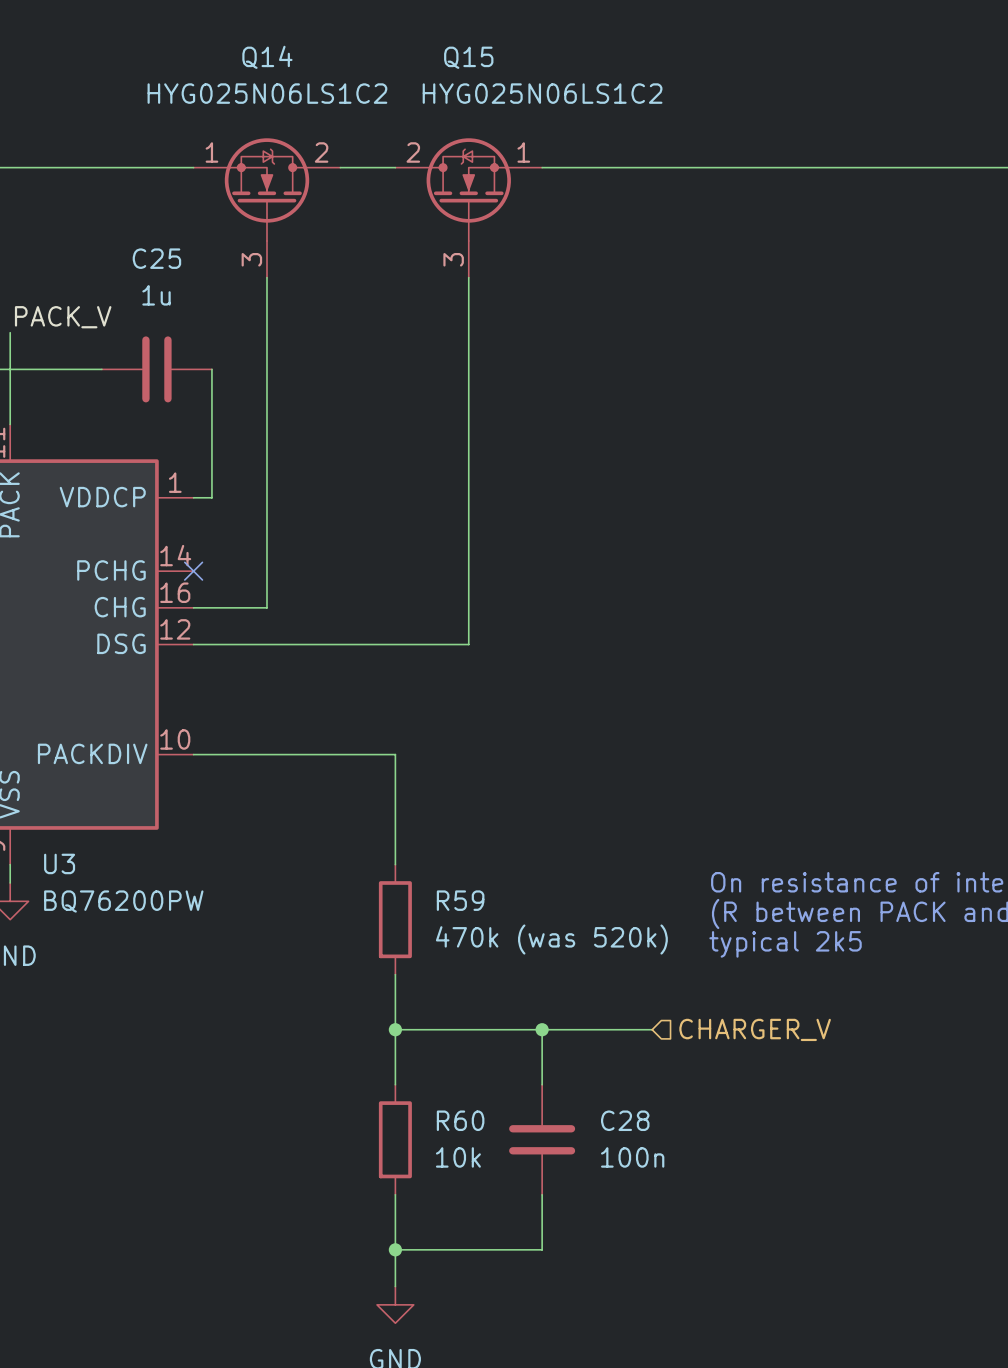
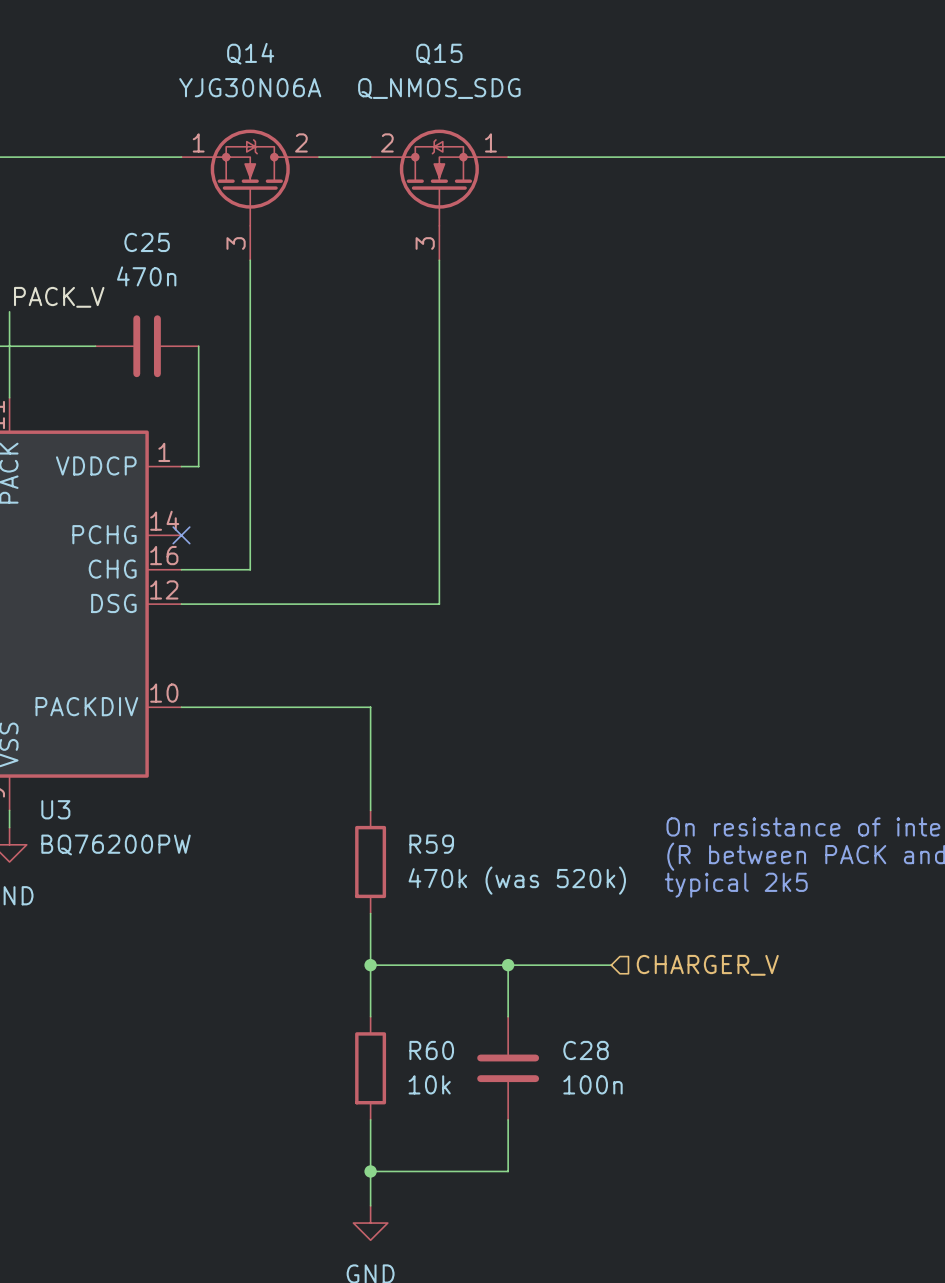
Q14 value: HYG025N06LS1C2 (267, 93) -> YJG30N06A (250, 87)
Q15 value: HYG025N06LS1C2 (542, 93) -> Q_NMOS_SDG (439, 88)
C25 value: 1u (156, 295) -> 470n (146, 276)

